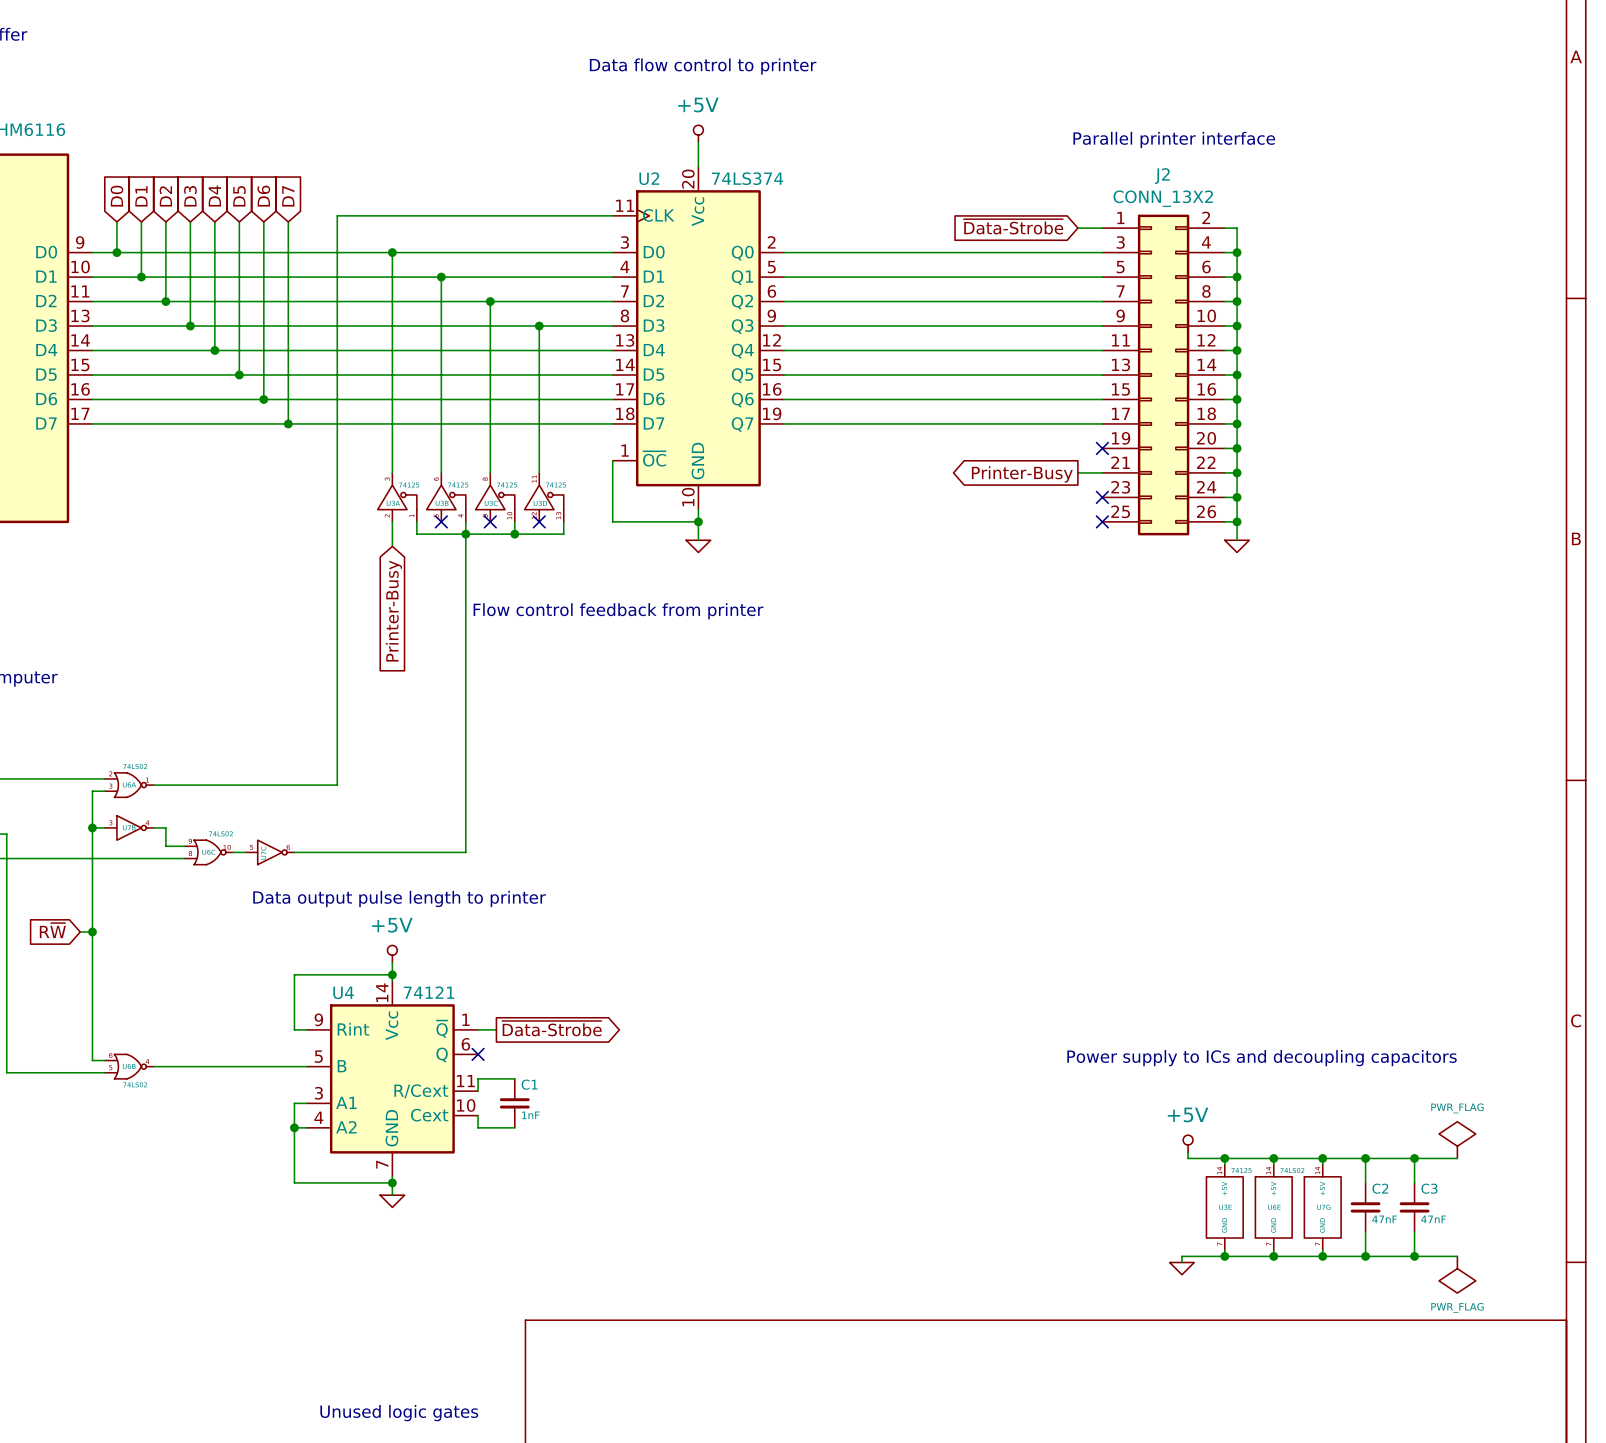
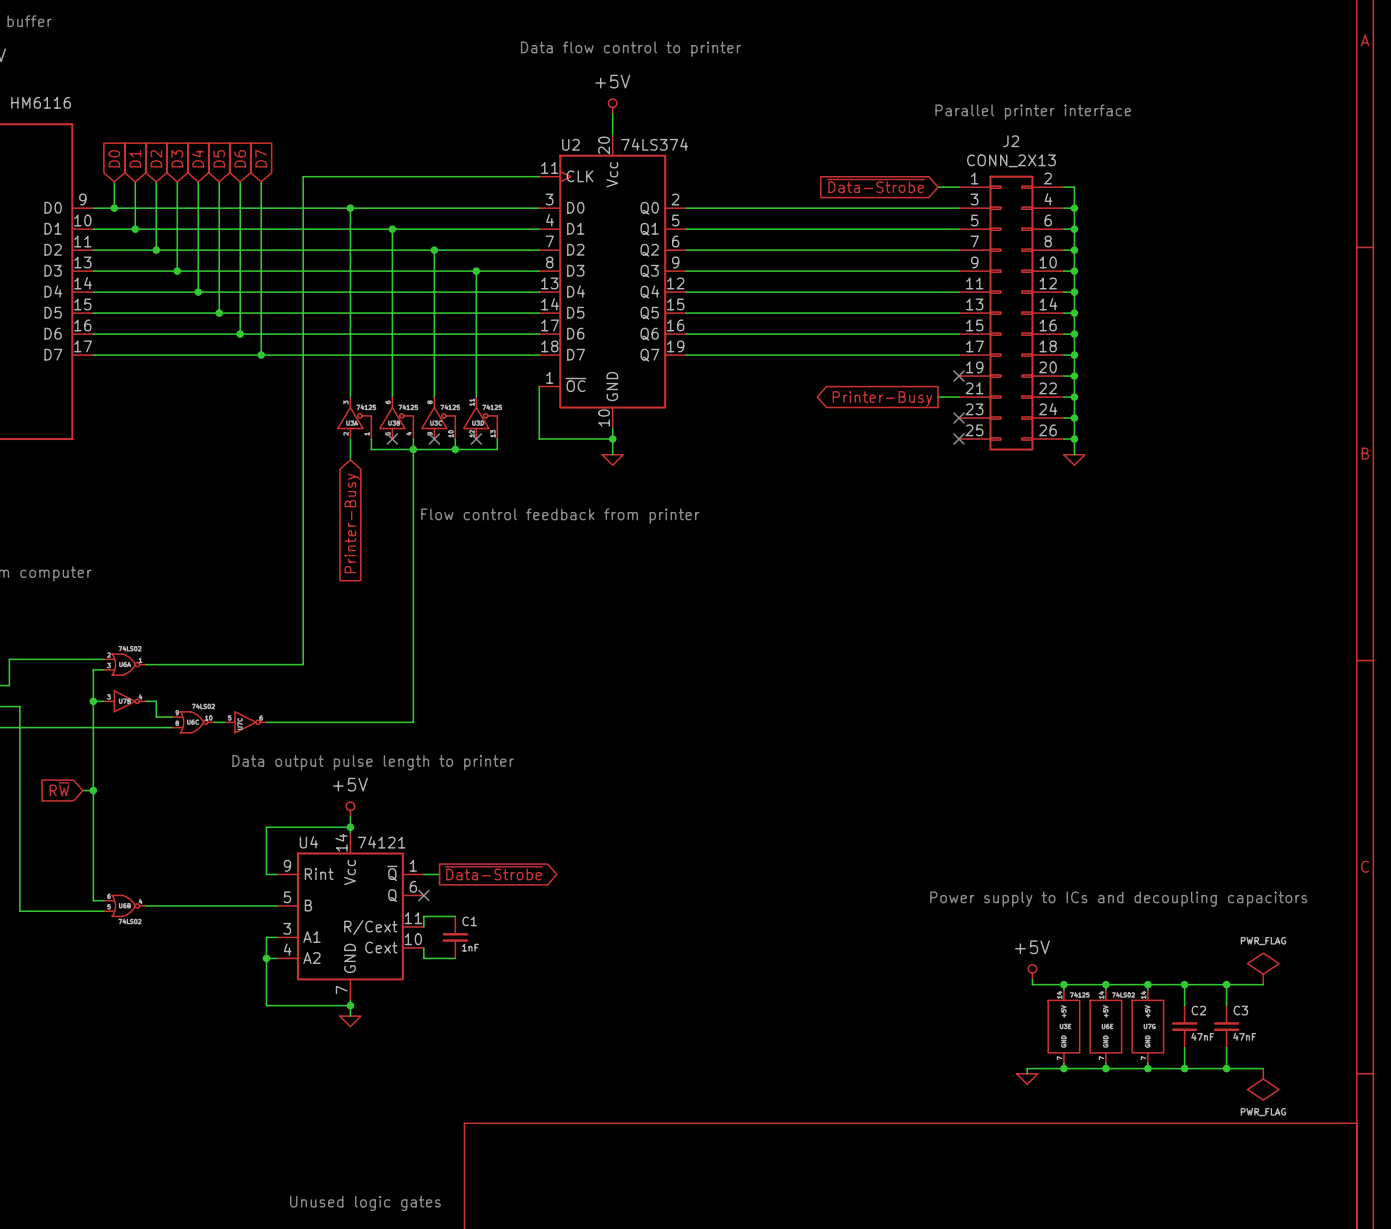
J2 value: CONN_13X2 (1163, 198) -> CONN_2X13 (1011, 160)

